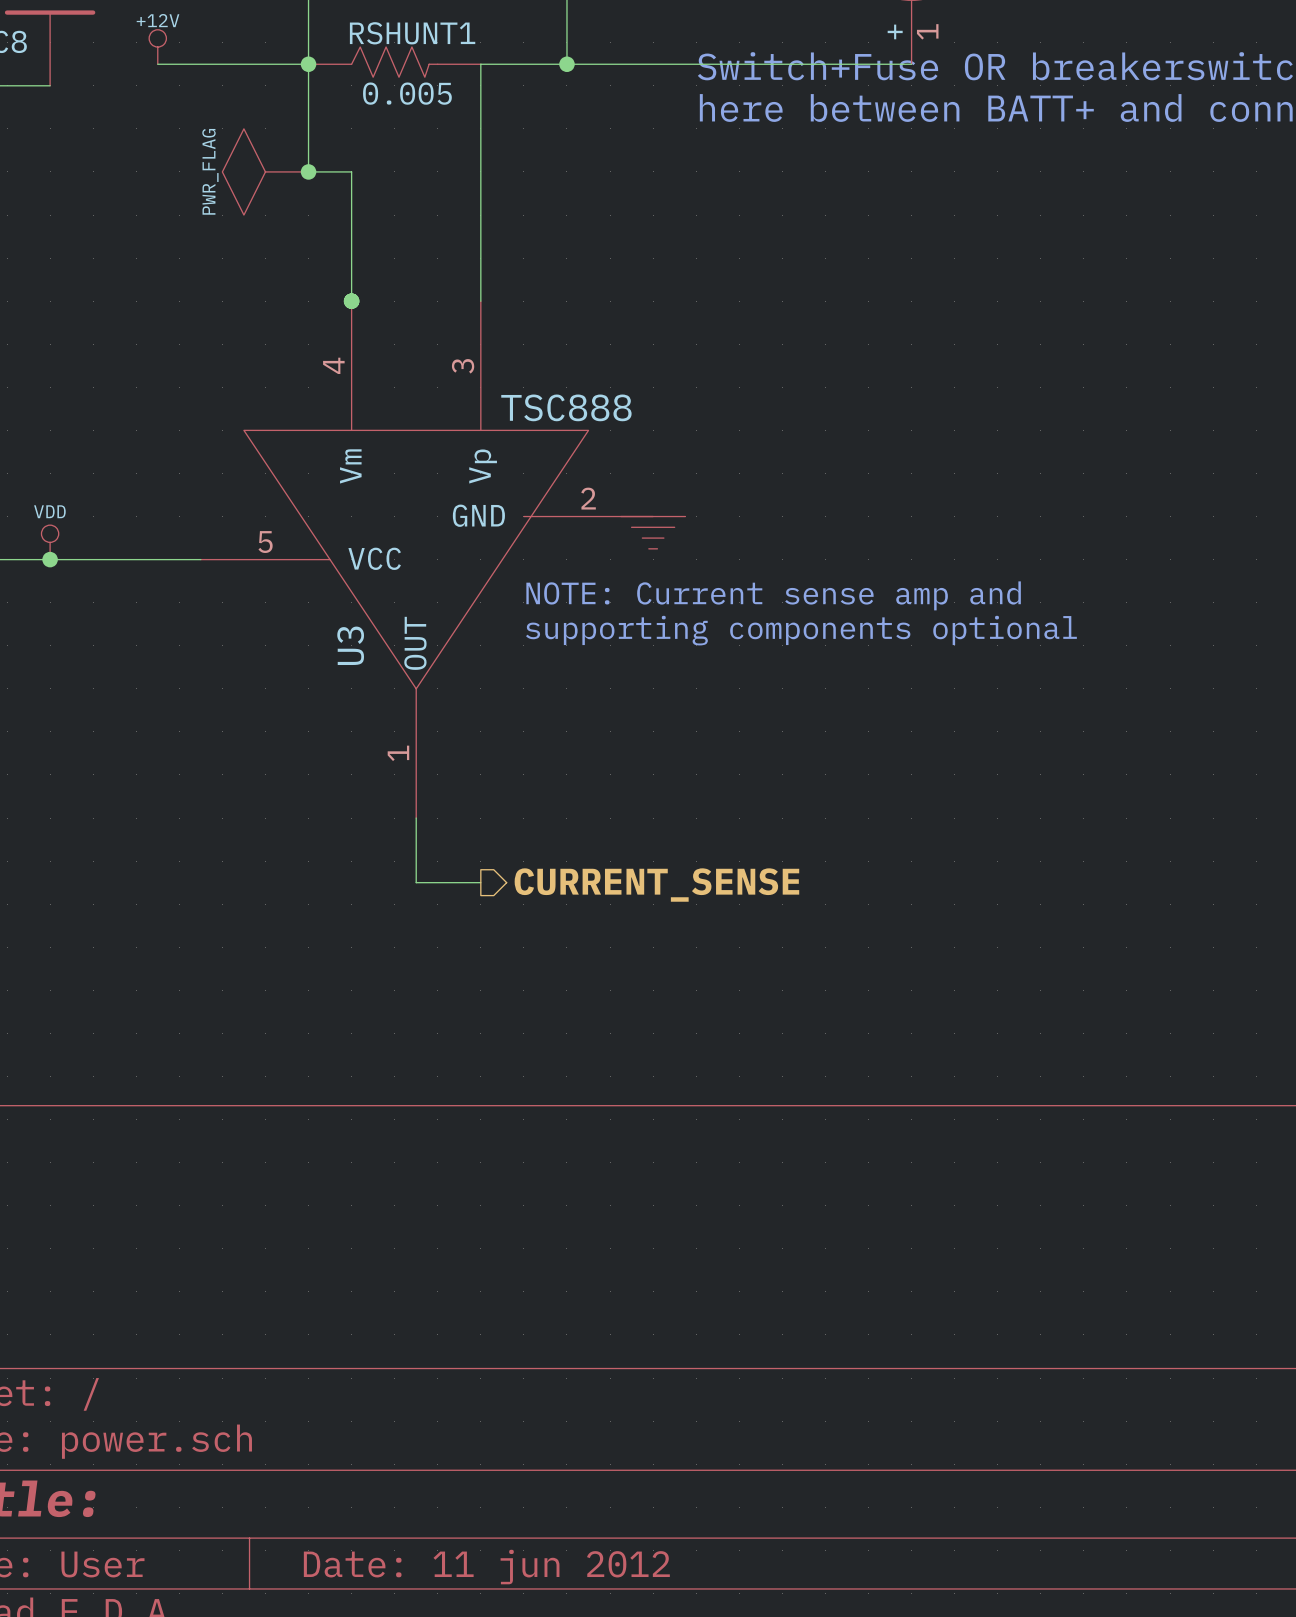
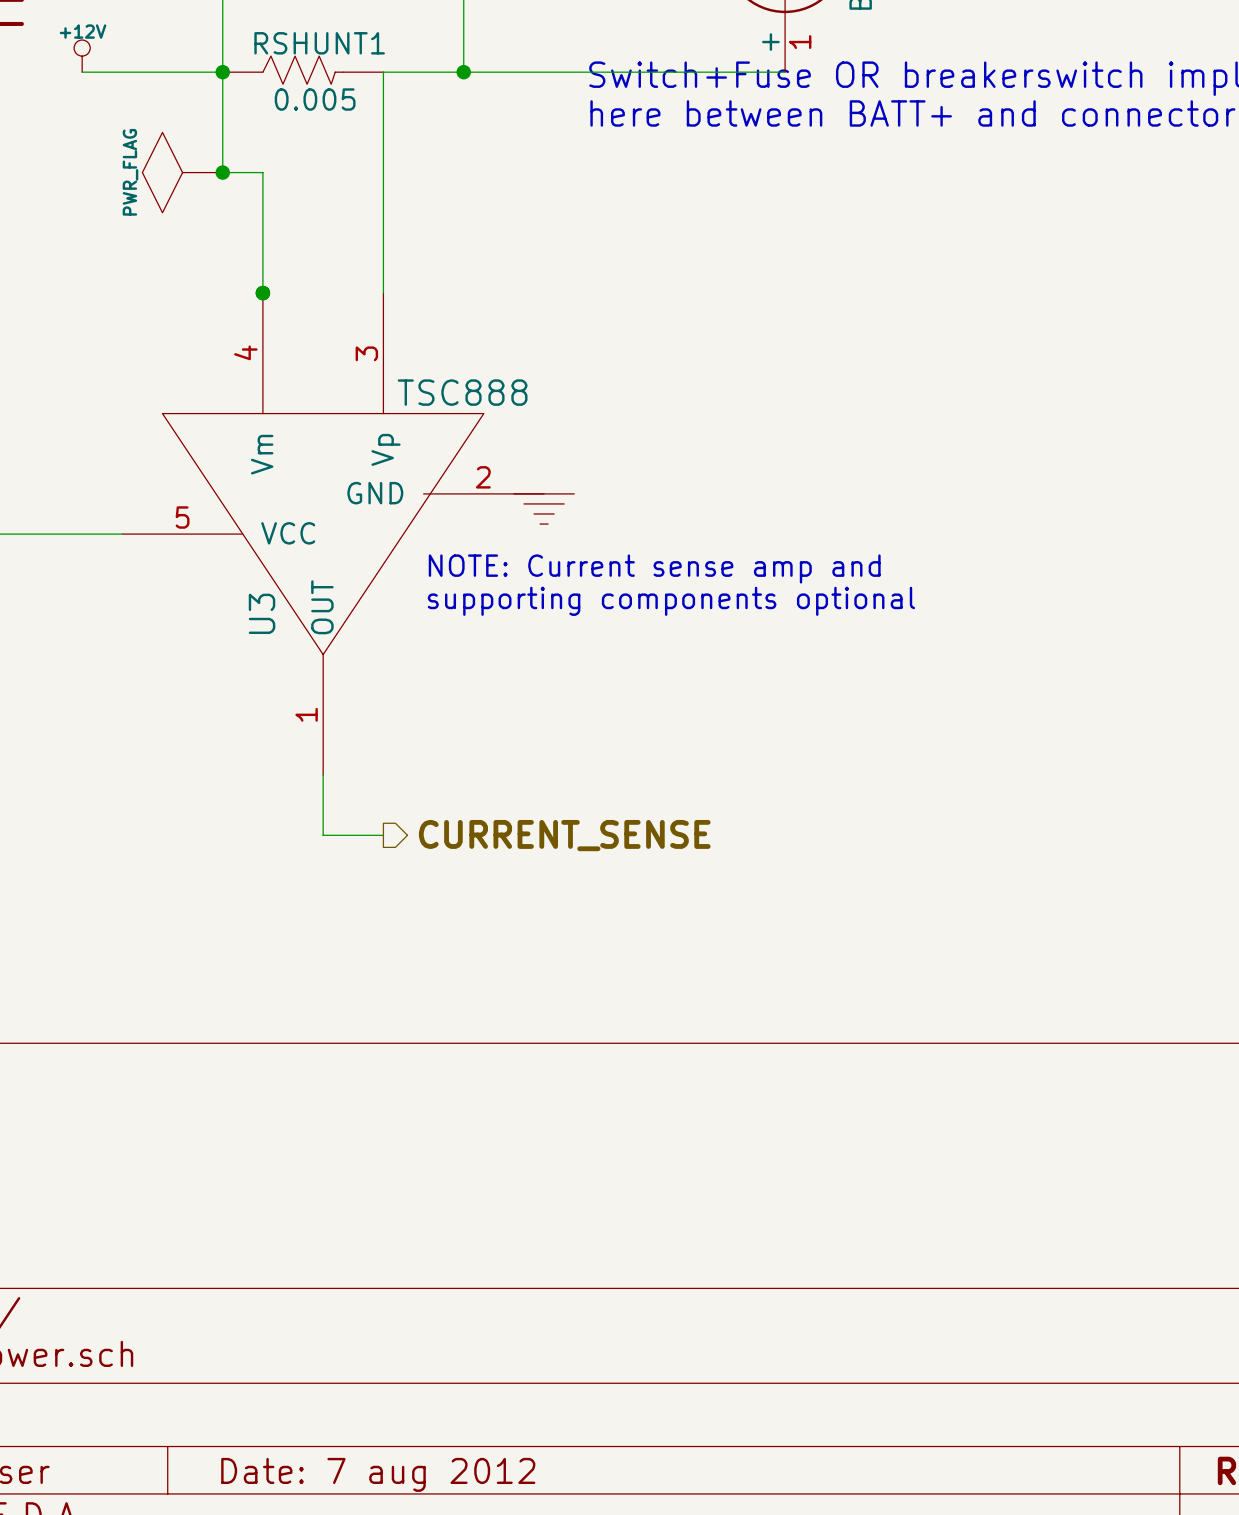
title block: Date: 11 jun 2012 (486, 1567) -> Date: 7 aug 2012 (378, 1474)

